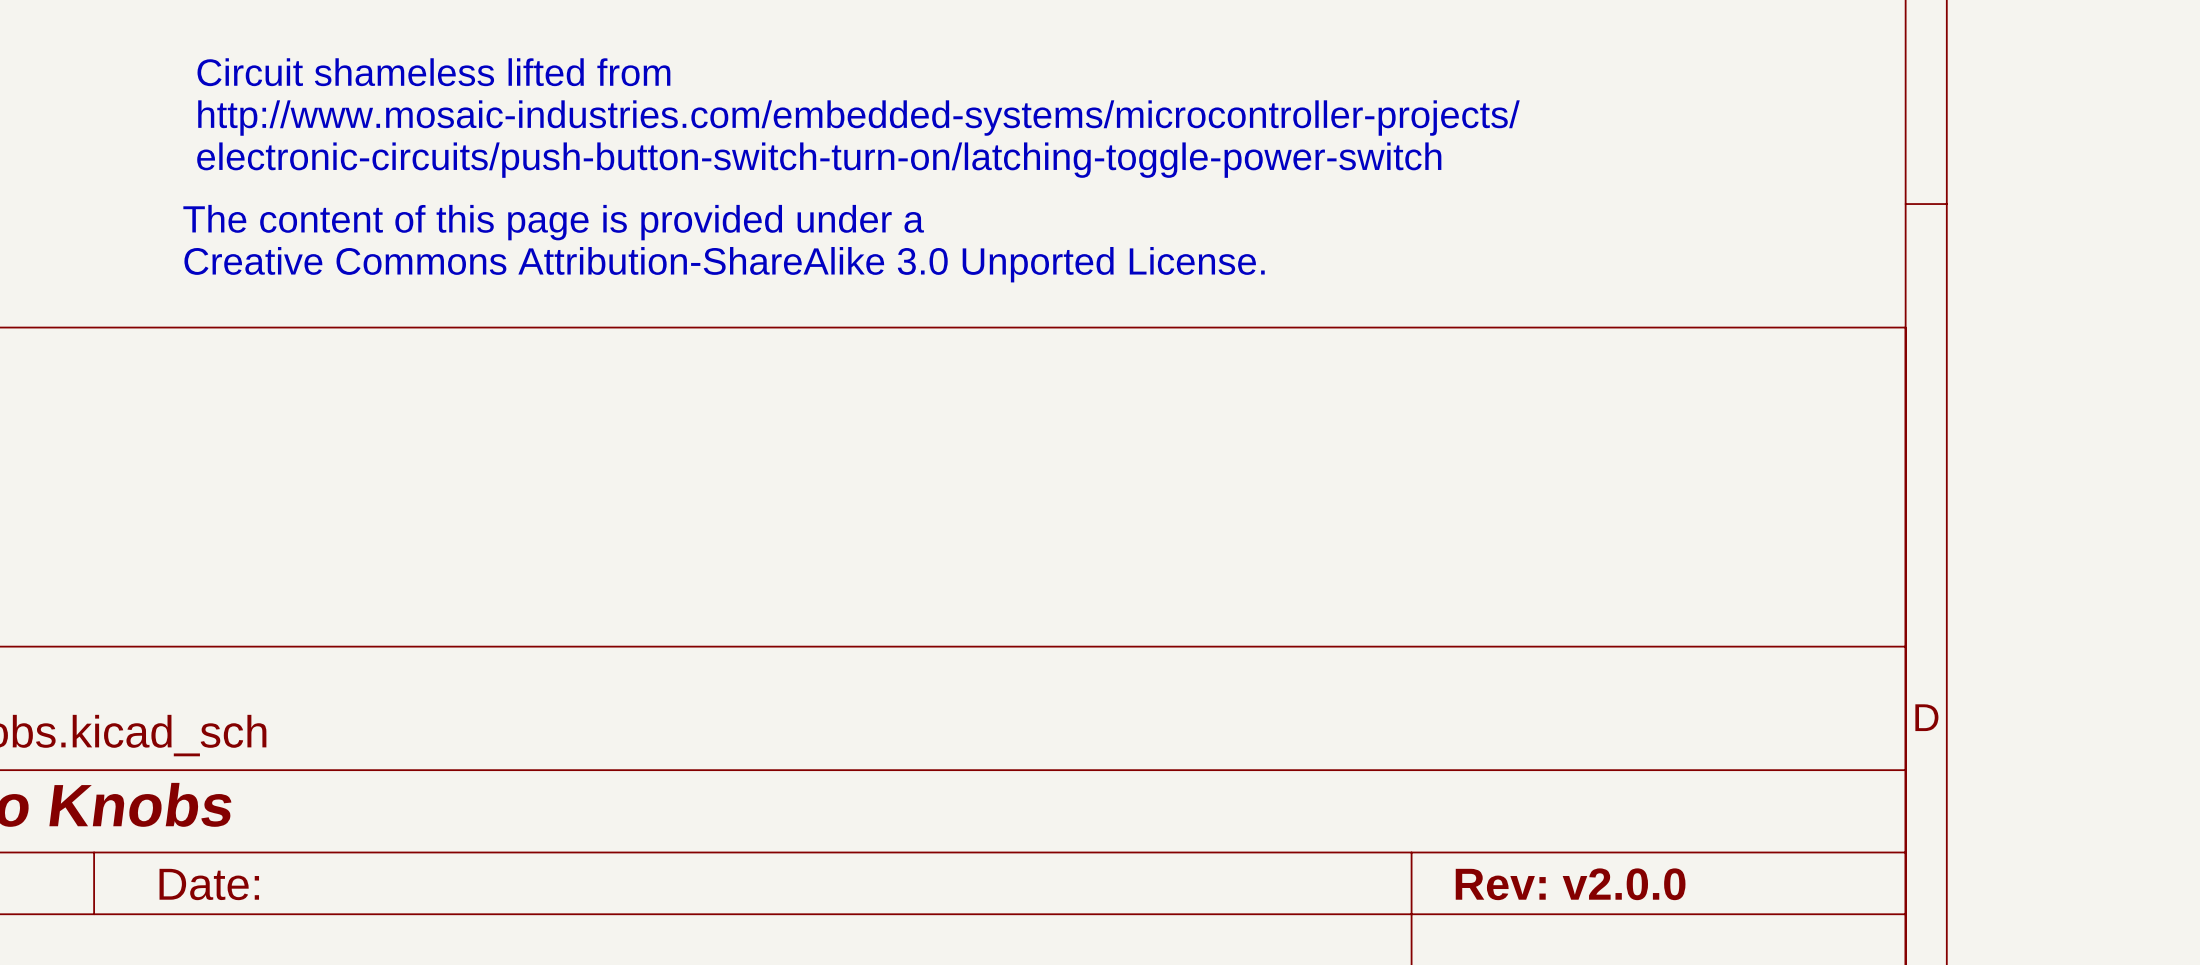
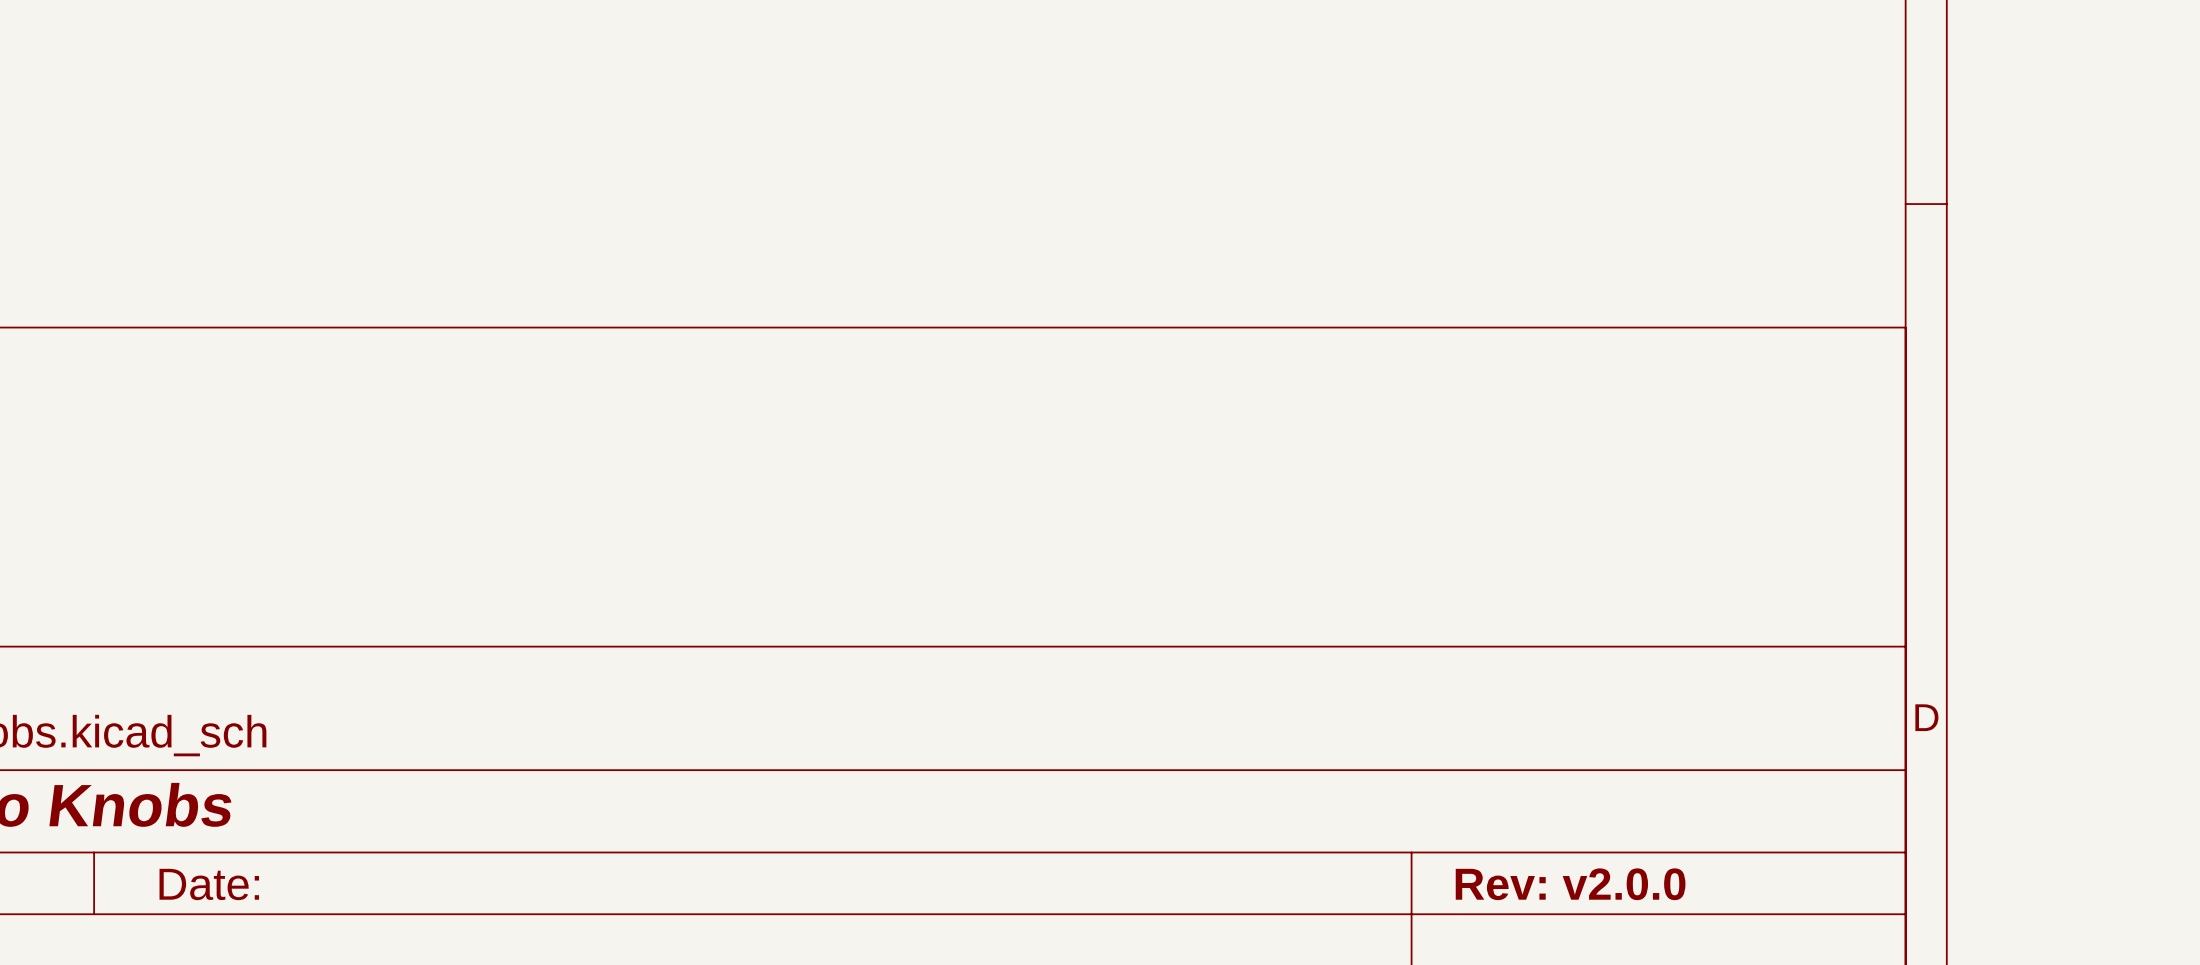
text: Circuit shameless lifted from (433, 72) -> none
text: http://www.mosaic-industries.com/embedded-systems/microcontroller-projects/ (858, 118) -> none
text: electronic-circuits/push-button-switch-turn-on/latching-toggle-power-switch (819, 160) -> none
text: The content of this page is provided under a (553, 222) -> none
text: Creative Commons Attribution-ShareAlike 3.0 Unported License. (724, 264) -> none

